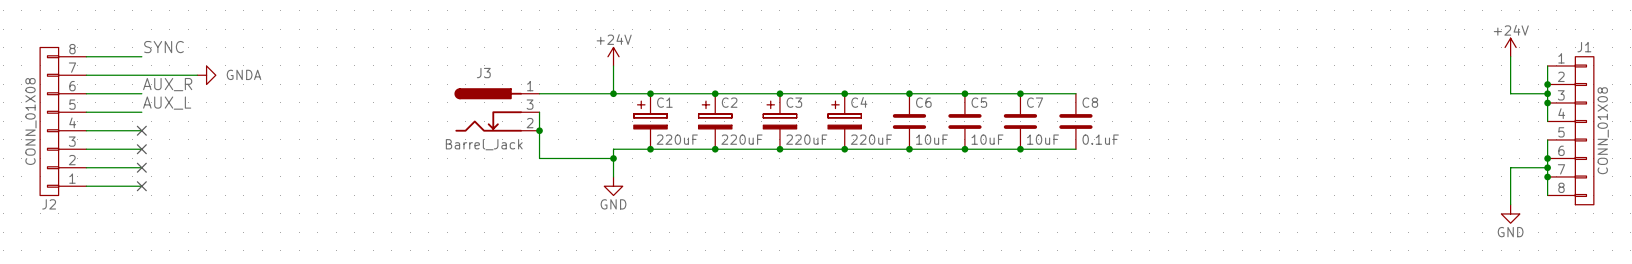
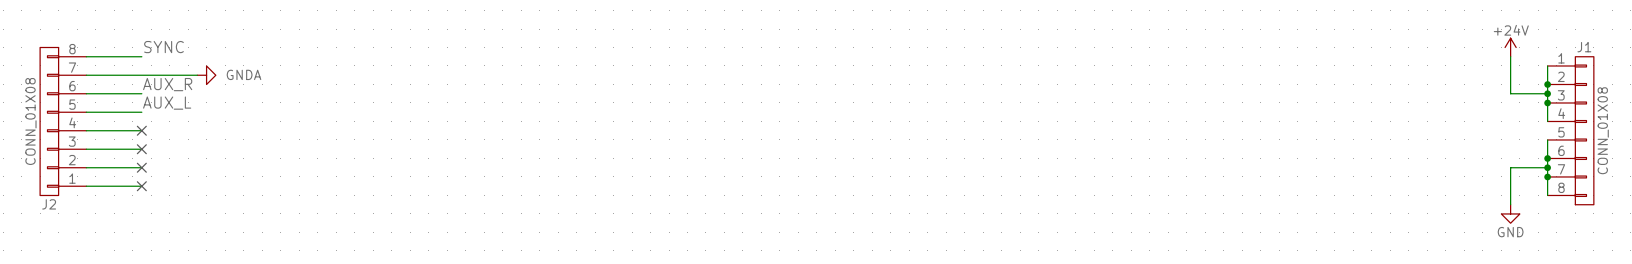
power symbol: +24V (613, 56) -> none
wire: (613, 65) (613, 93) -> none
wire: (539, 93) (1075, 93) -> none
junction: (613, 93) -> none
junction: (650, 93) -> none
junction: (715, 93) -> none
junction: (779, 93) -> none
junction: (844, 93) -> none
junction: (909, 93) -> none
junction: (964, 93) -> none
junction: (1020, 93) -> none
J3: Barrel_Jack (496, 109) -> none
wire: (539, 112) (539, 158) (613, 158) -> none
C1: 220uF (650, 121) -> none
C2: 220uF (715, 121) -> none
C3: 220uF (779, 121) -> none
C4: 220uF (844, 121) -> none
C6: 10uF (909, 121) -> none
C5: 10uF (964, 121) -> none
C7: 10uF (1020, 121) -> none
C8: 0.1uF (1075, 121) -> none
junction: (539, 130) -> none
junction: (650, 149) -> none
junction: (715, 149) -> none
junction: (779, 149) -> none
junction: (844, 149) -> none
junction: (909, 149) -> none
junction: (964, 149) -> none
junction: (1020, 149) -> none
wire: (1075, 149) (613, 149) (613, 176) -> none
junction: (613, 158) -> none
power symbol: GND (613, 186) -> none

